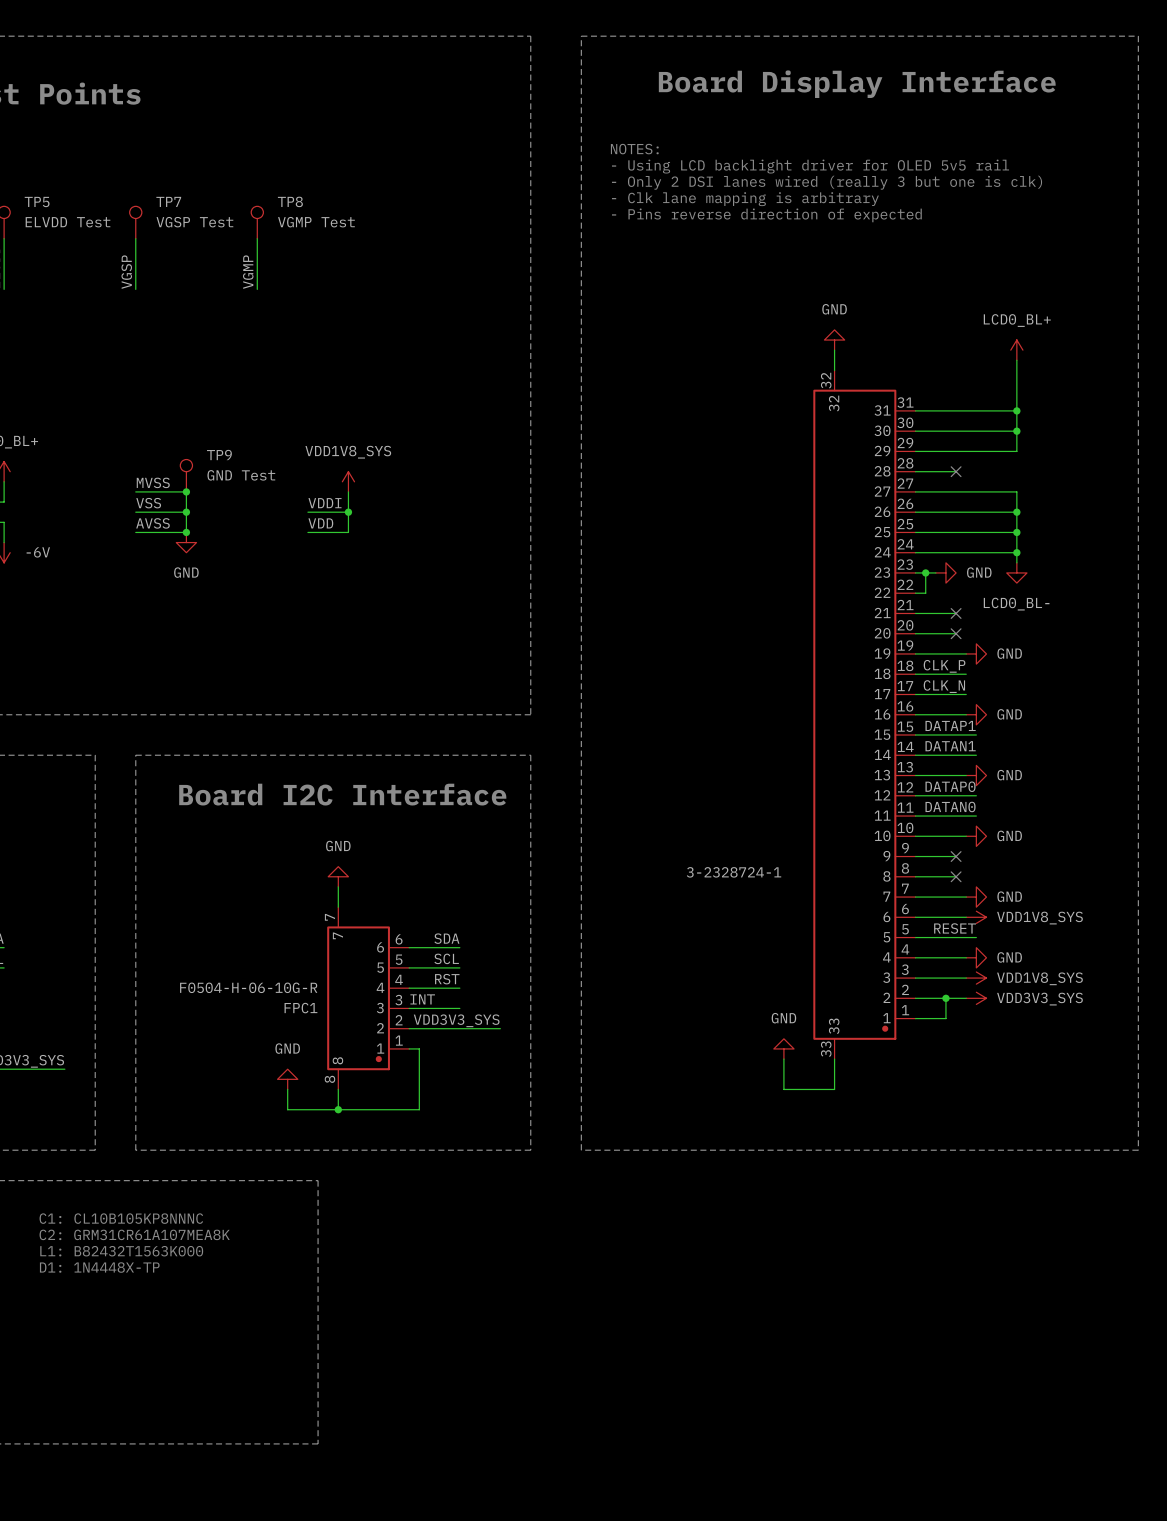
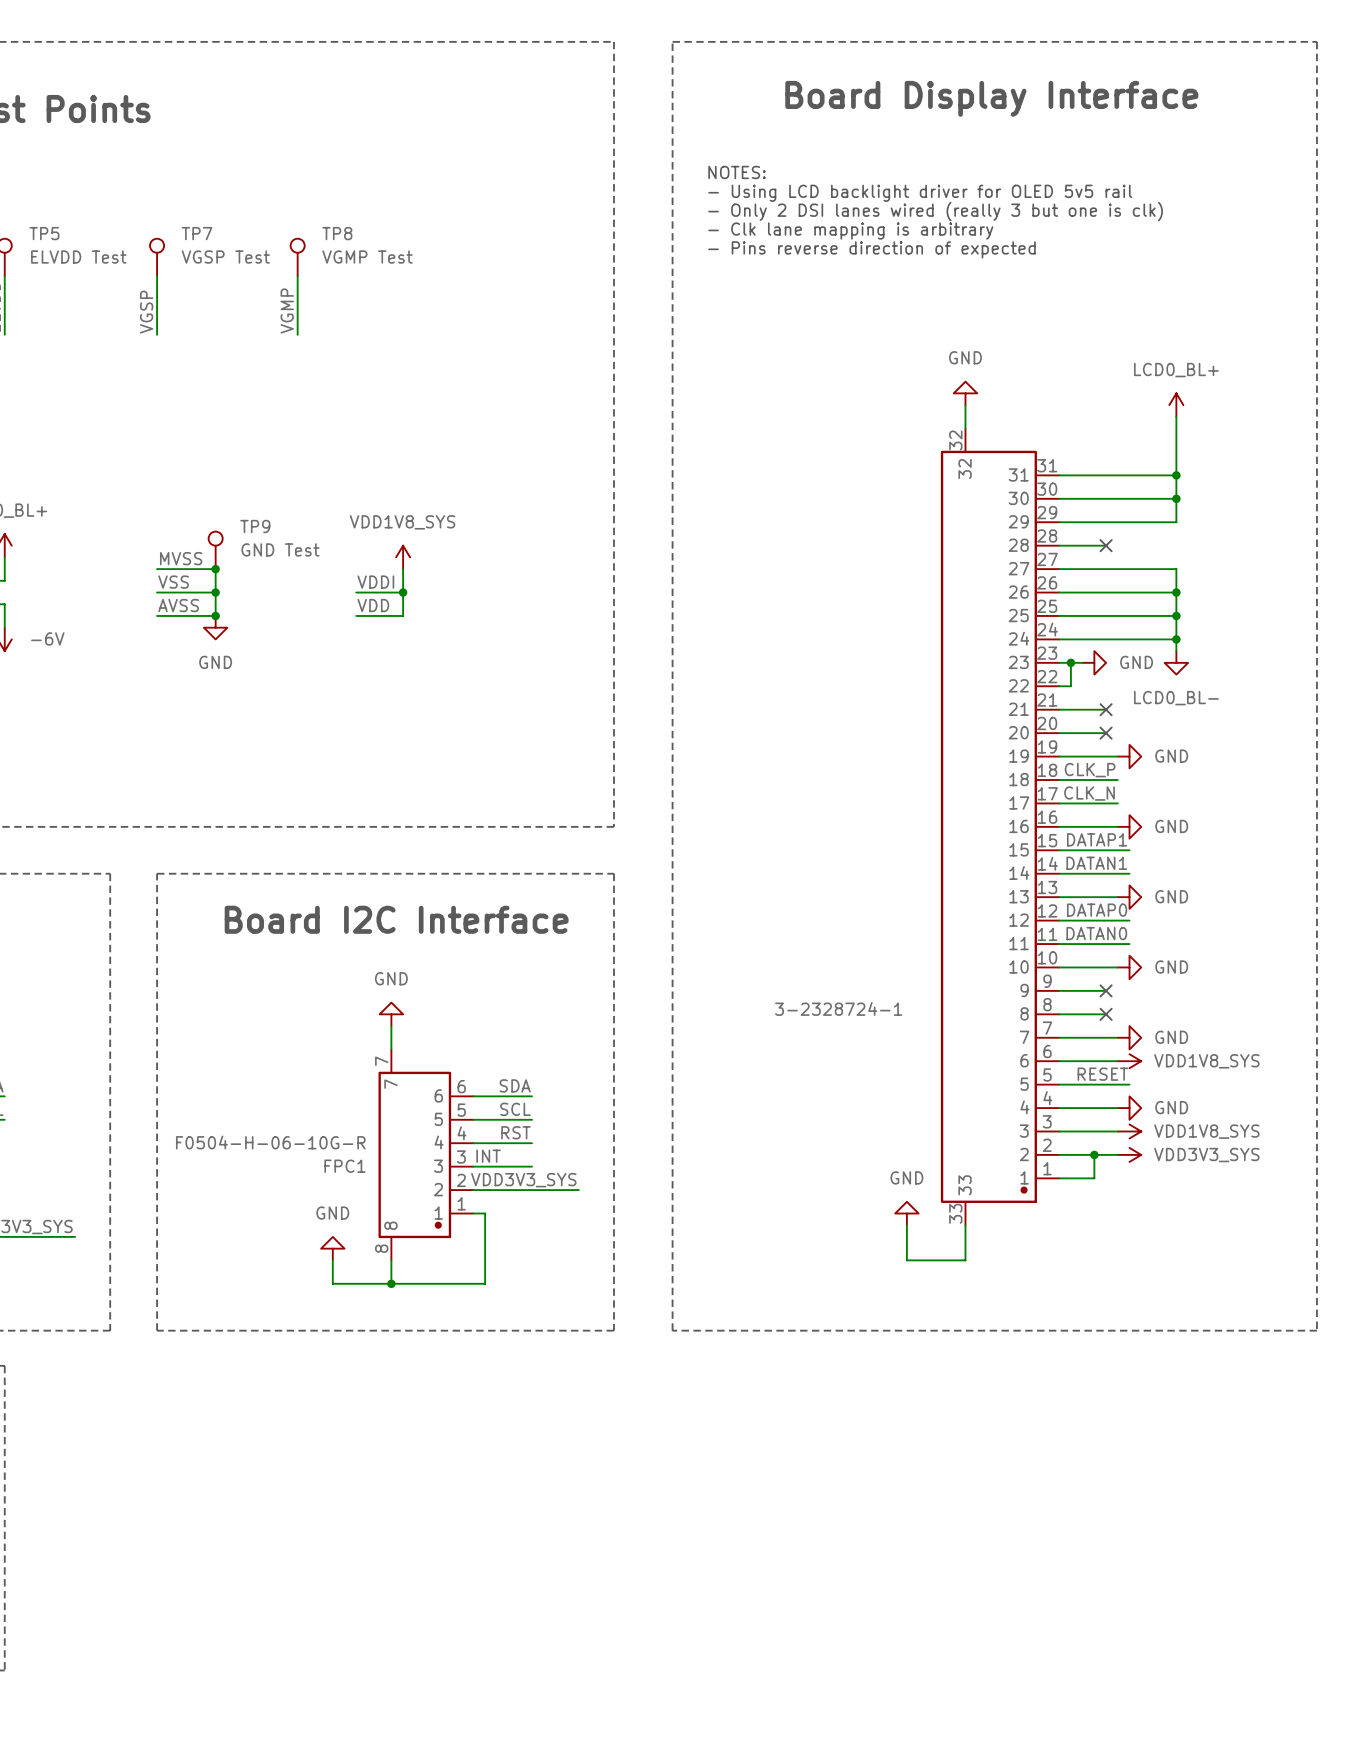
line: (4, 1180) (318, 1180) (318, 1443) (4, 1443) -> (4, 1365) (4, 1670)
text: C1: CL10B105KP8NNNC (121, 1218) -> none
text: C2: GRM31CR61A107MEA8K (134, 1234) -> none
text: L1: B82432T1563K000 (121, 1251) -> none
text: D1: 1N4448X-TP (99, 1267) -> none

